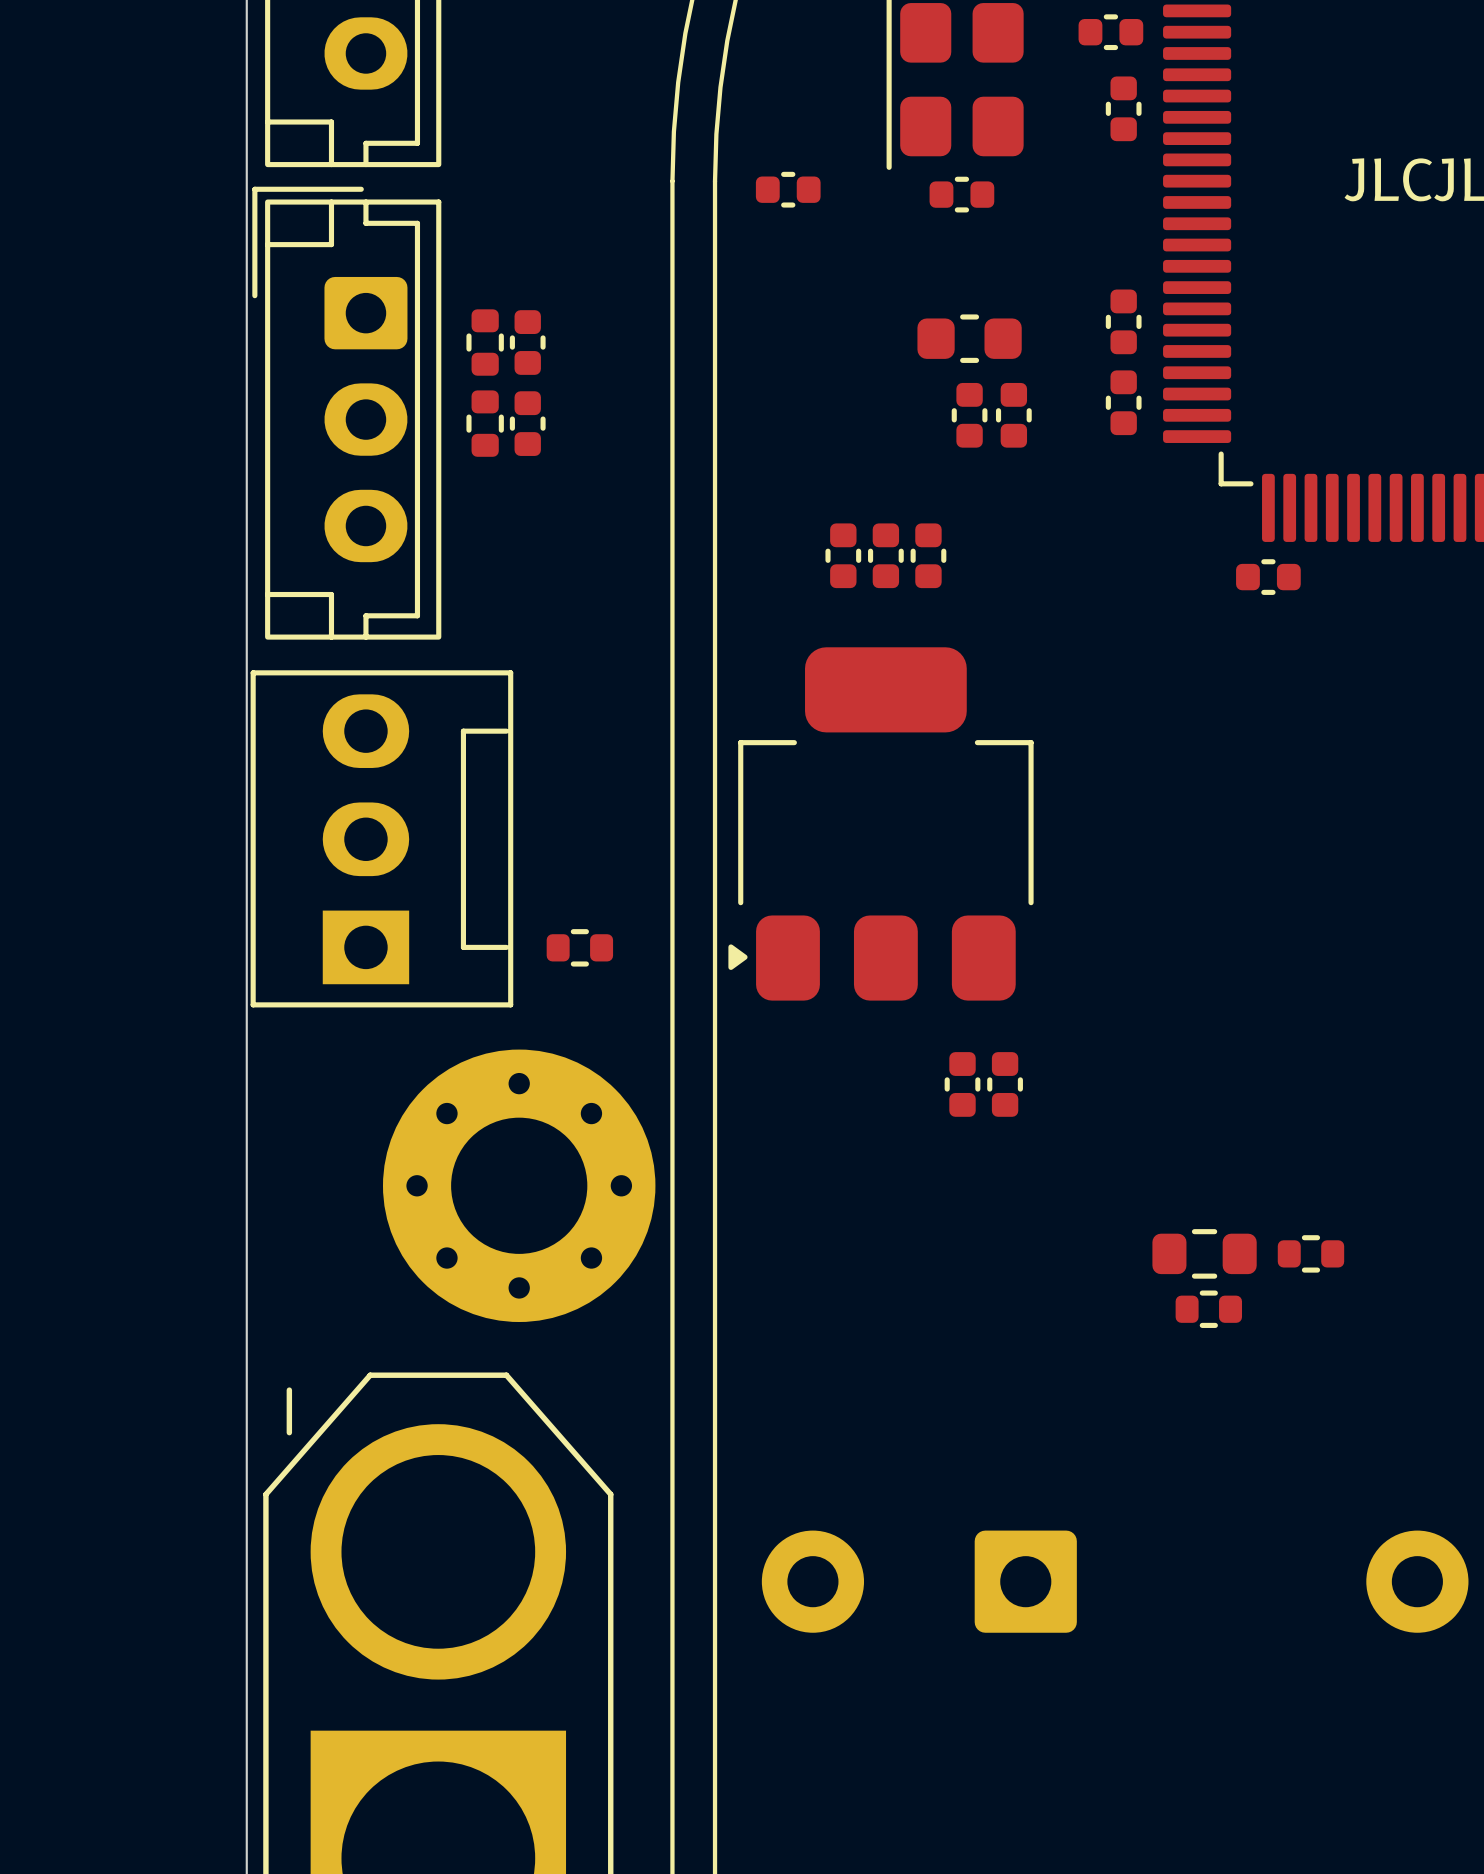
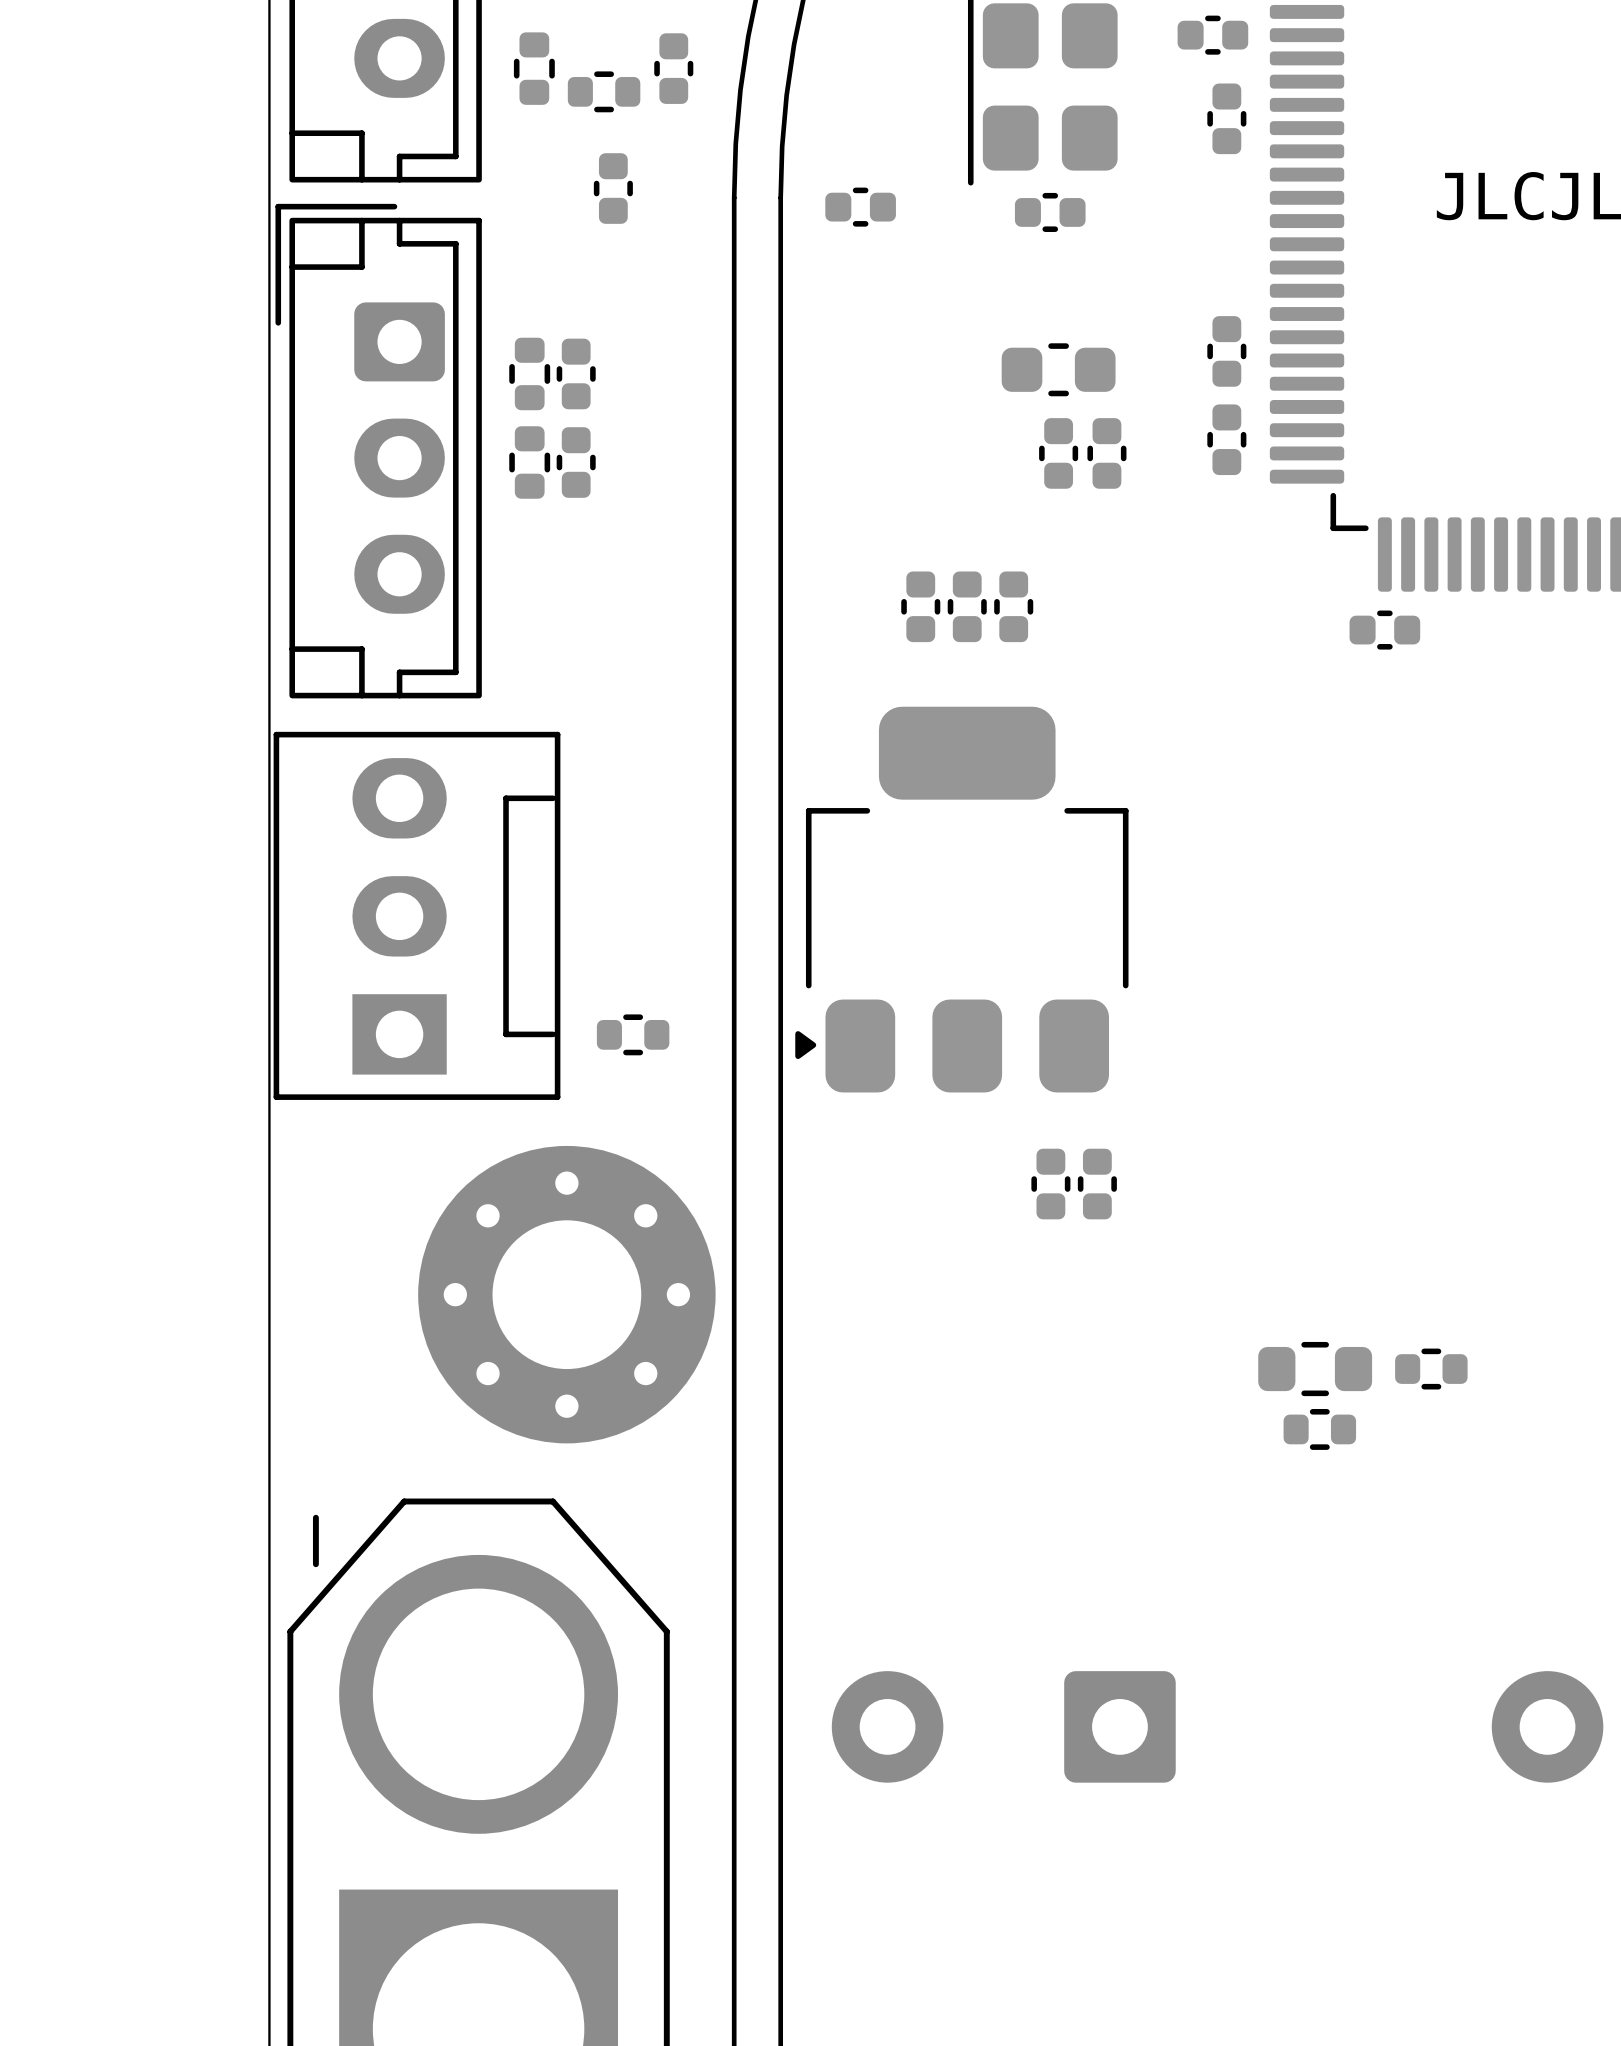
part: none -> (534, 68)
part: none -> (673, 68)
part: none -> (604, 91)
part: none -> (613, 188)

